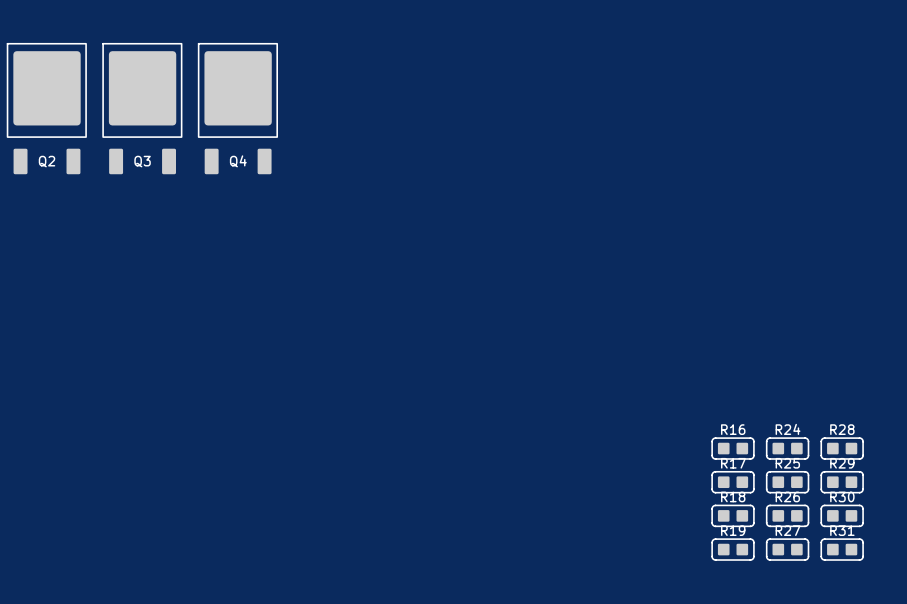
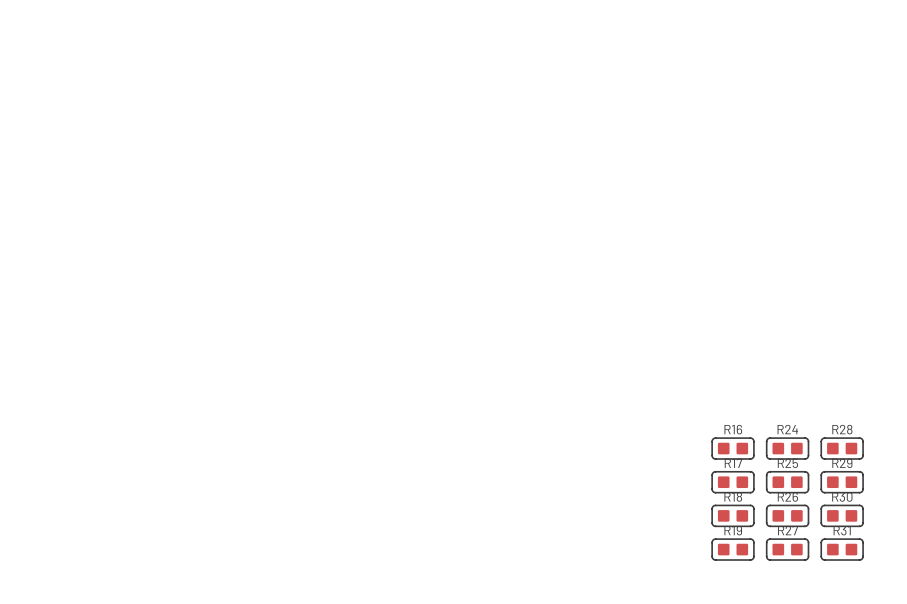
Q2: (46, 108) -> none
Q3: (142, 108) -> none
Q4: (237, 108) -> none

